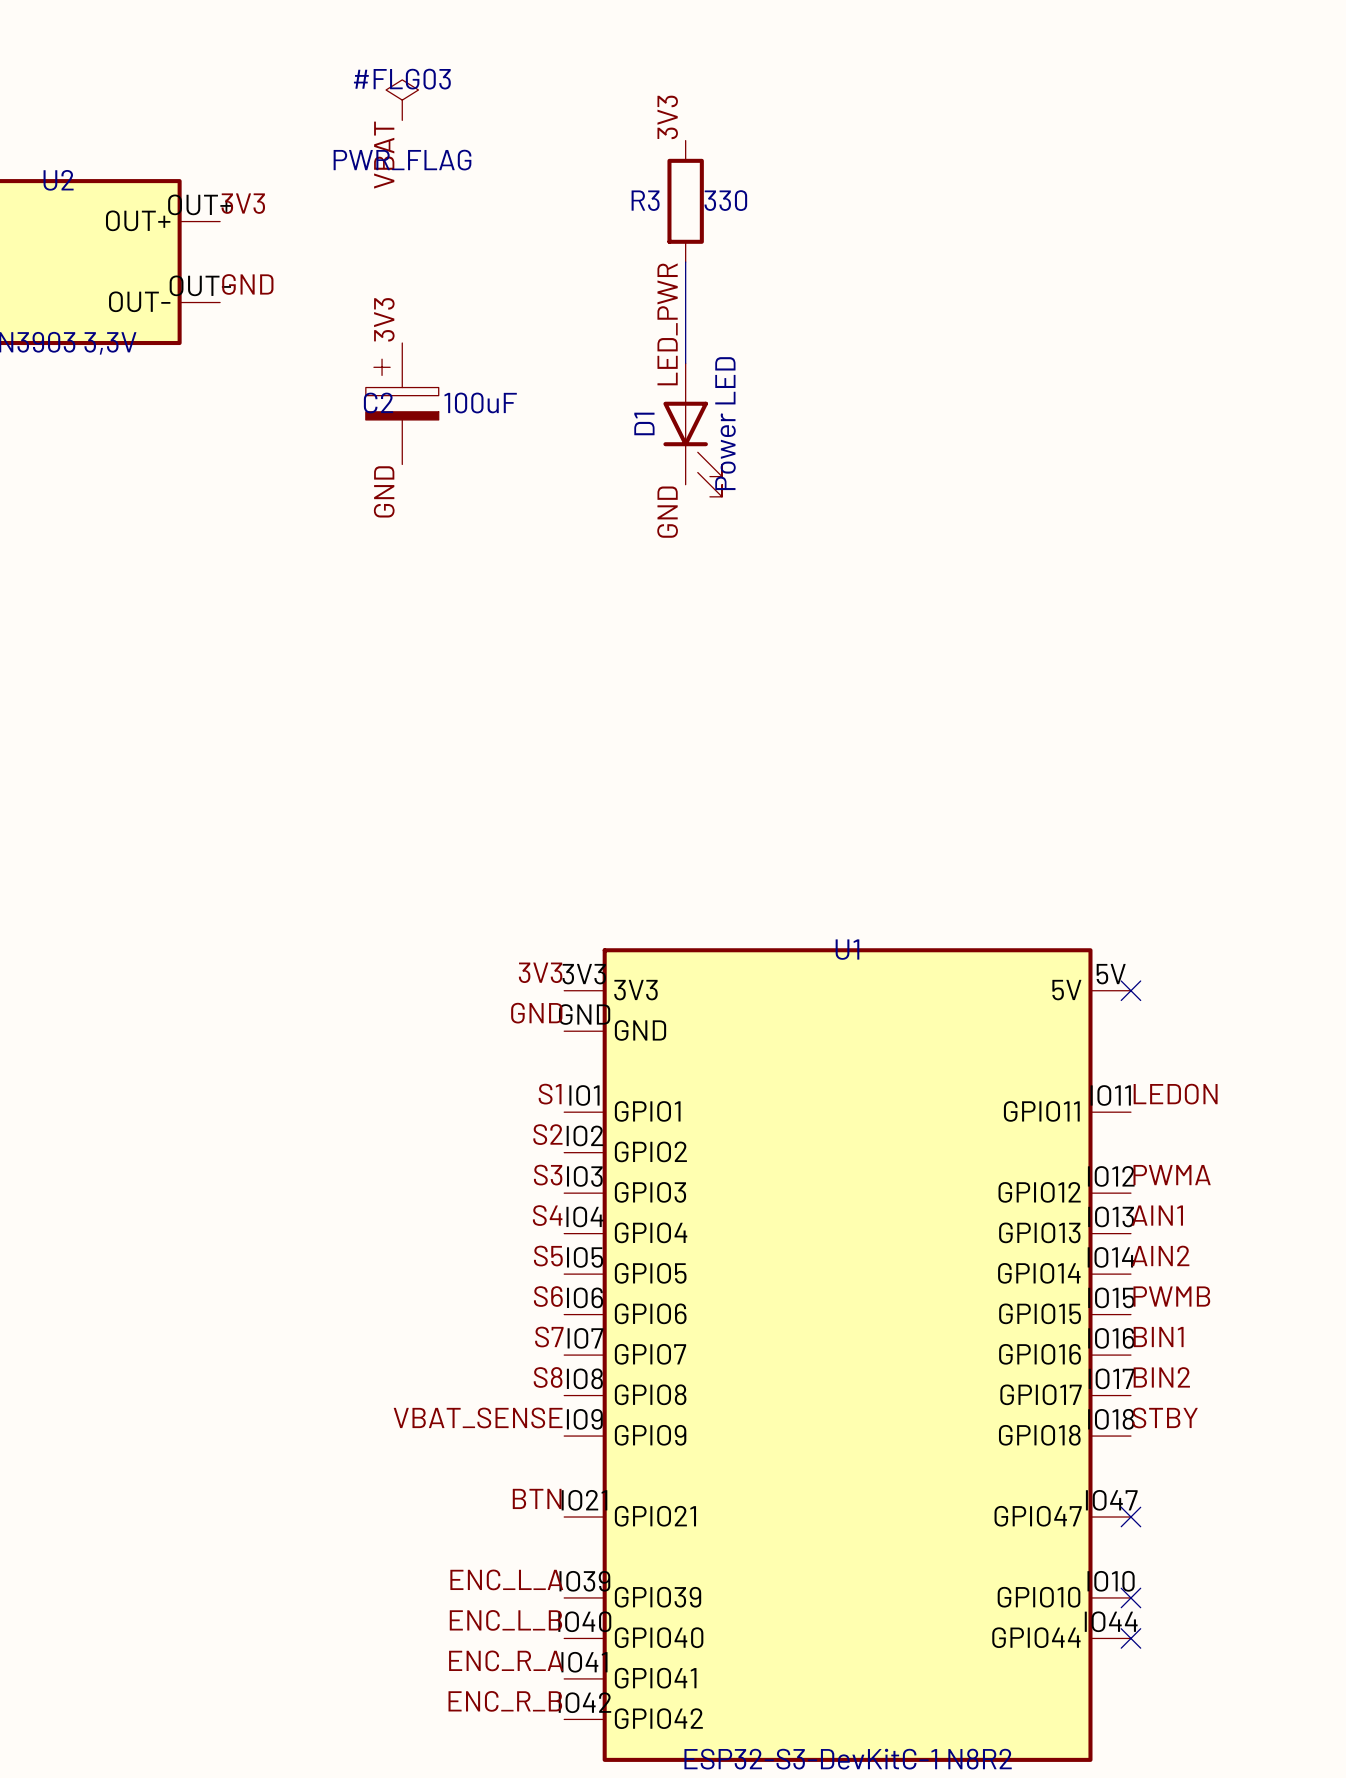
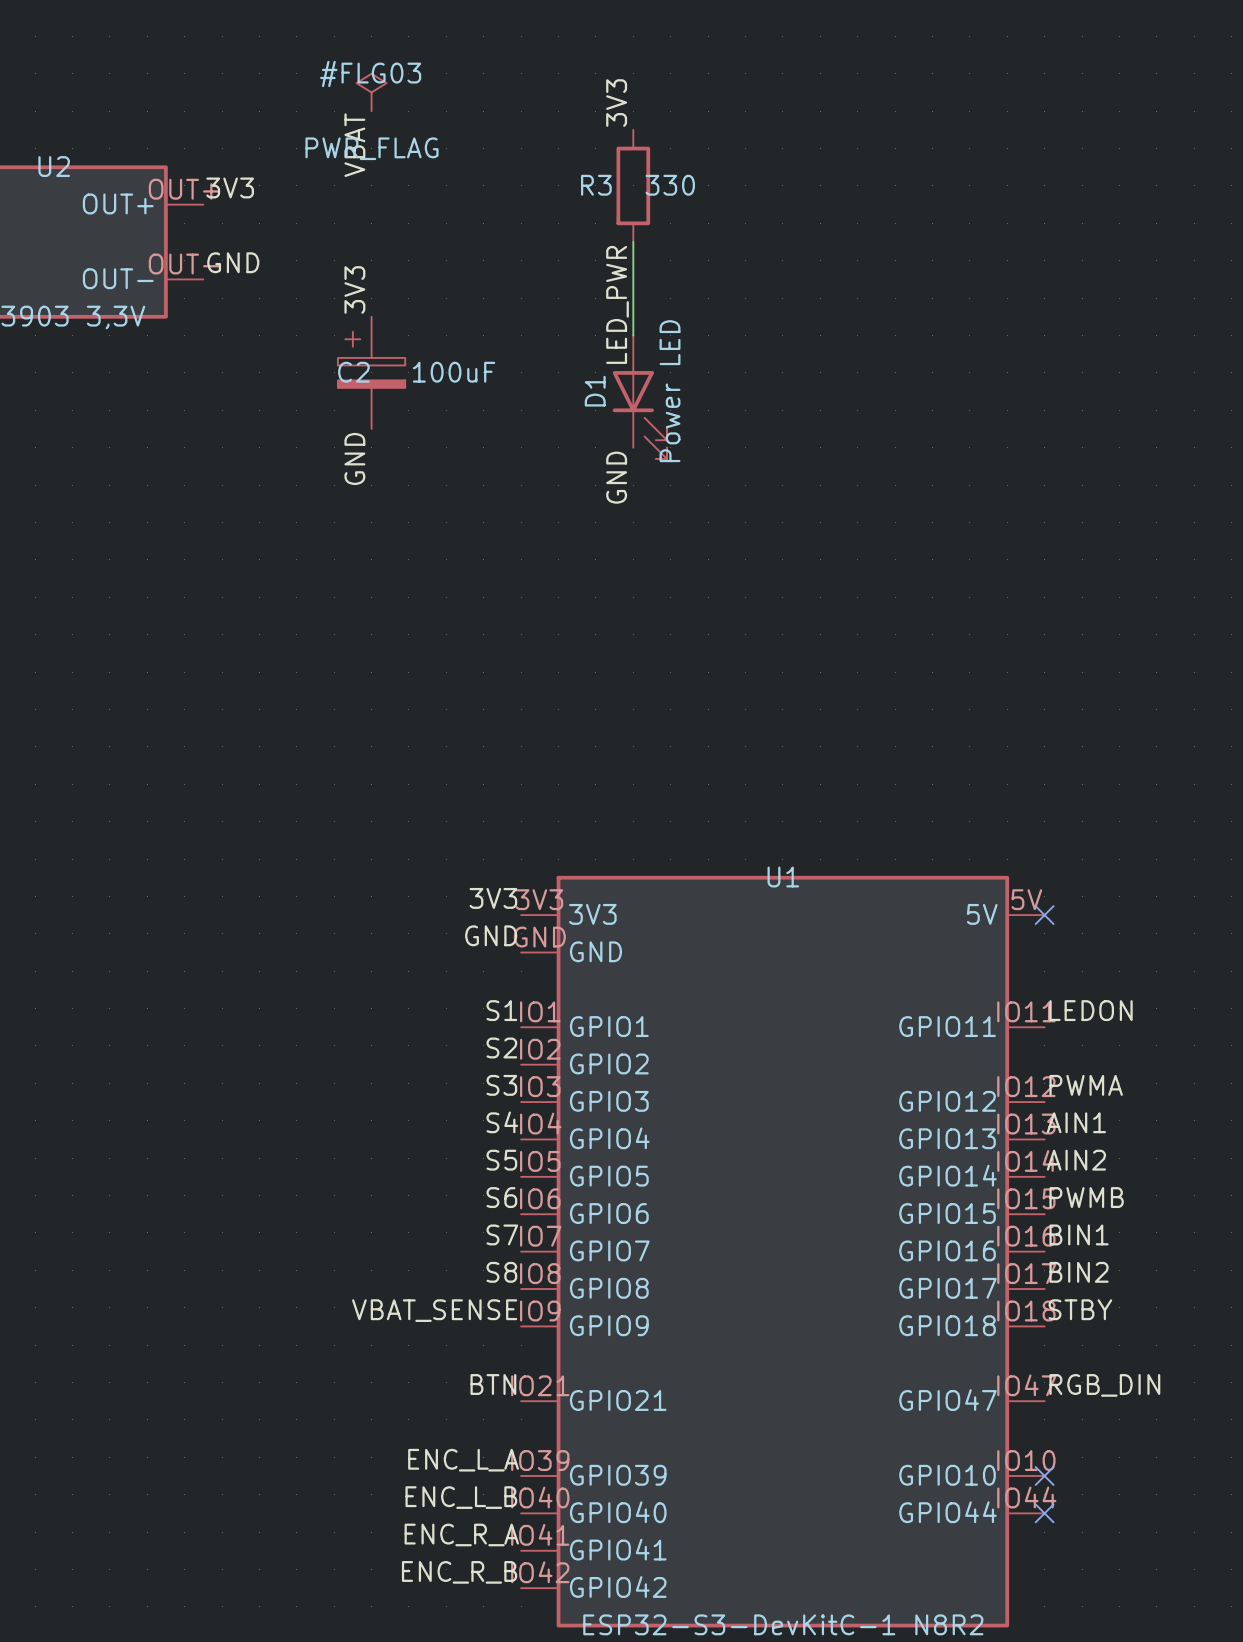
label: none -> RGB_DIN (1104, 1385)
no-connect mark: (1130, 1517) -> none

